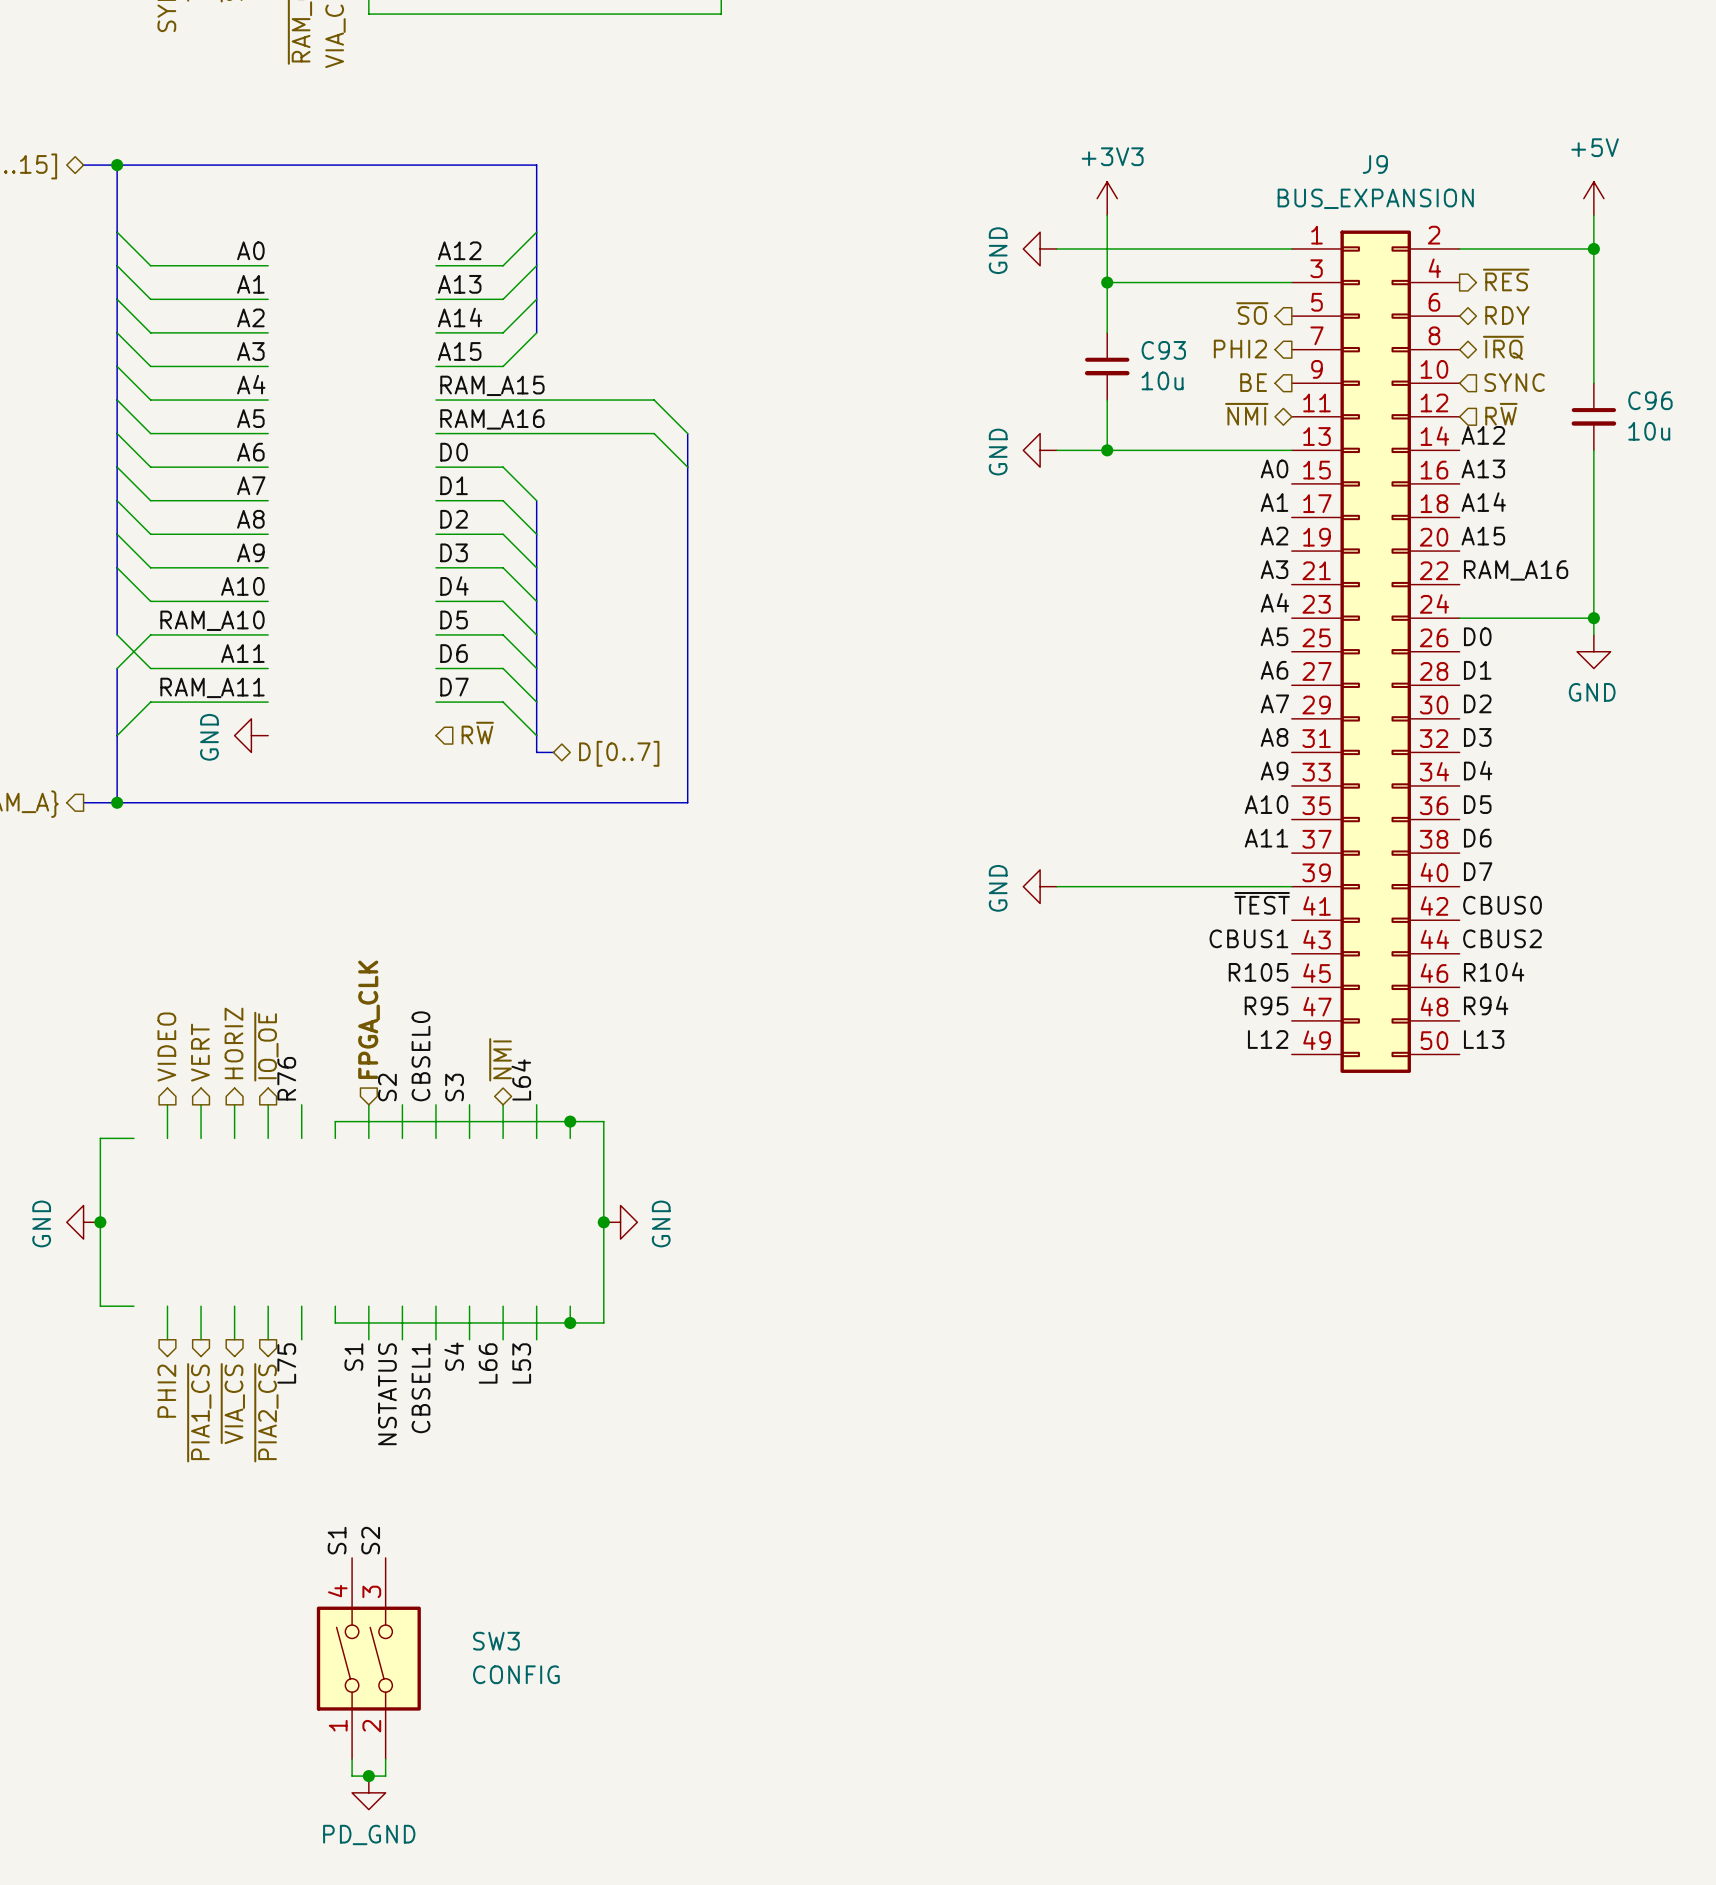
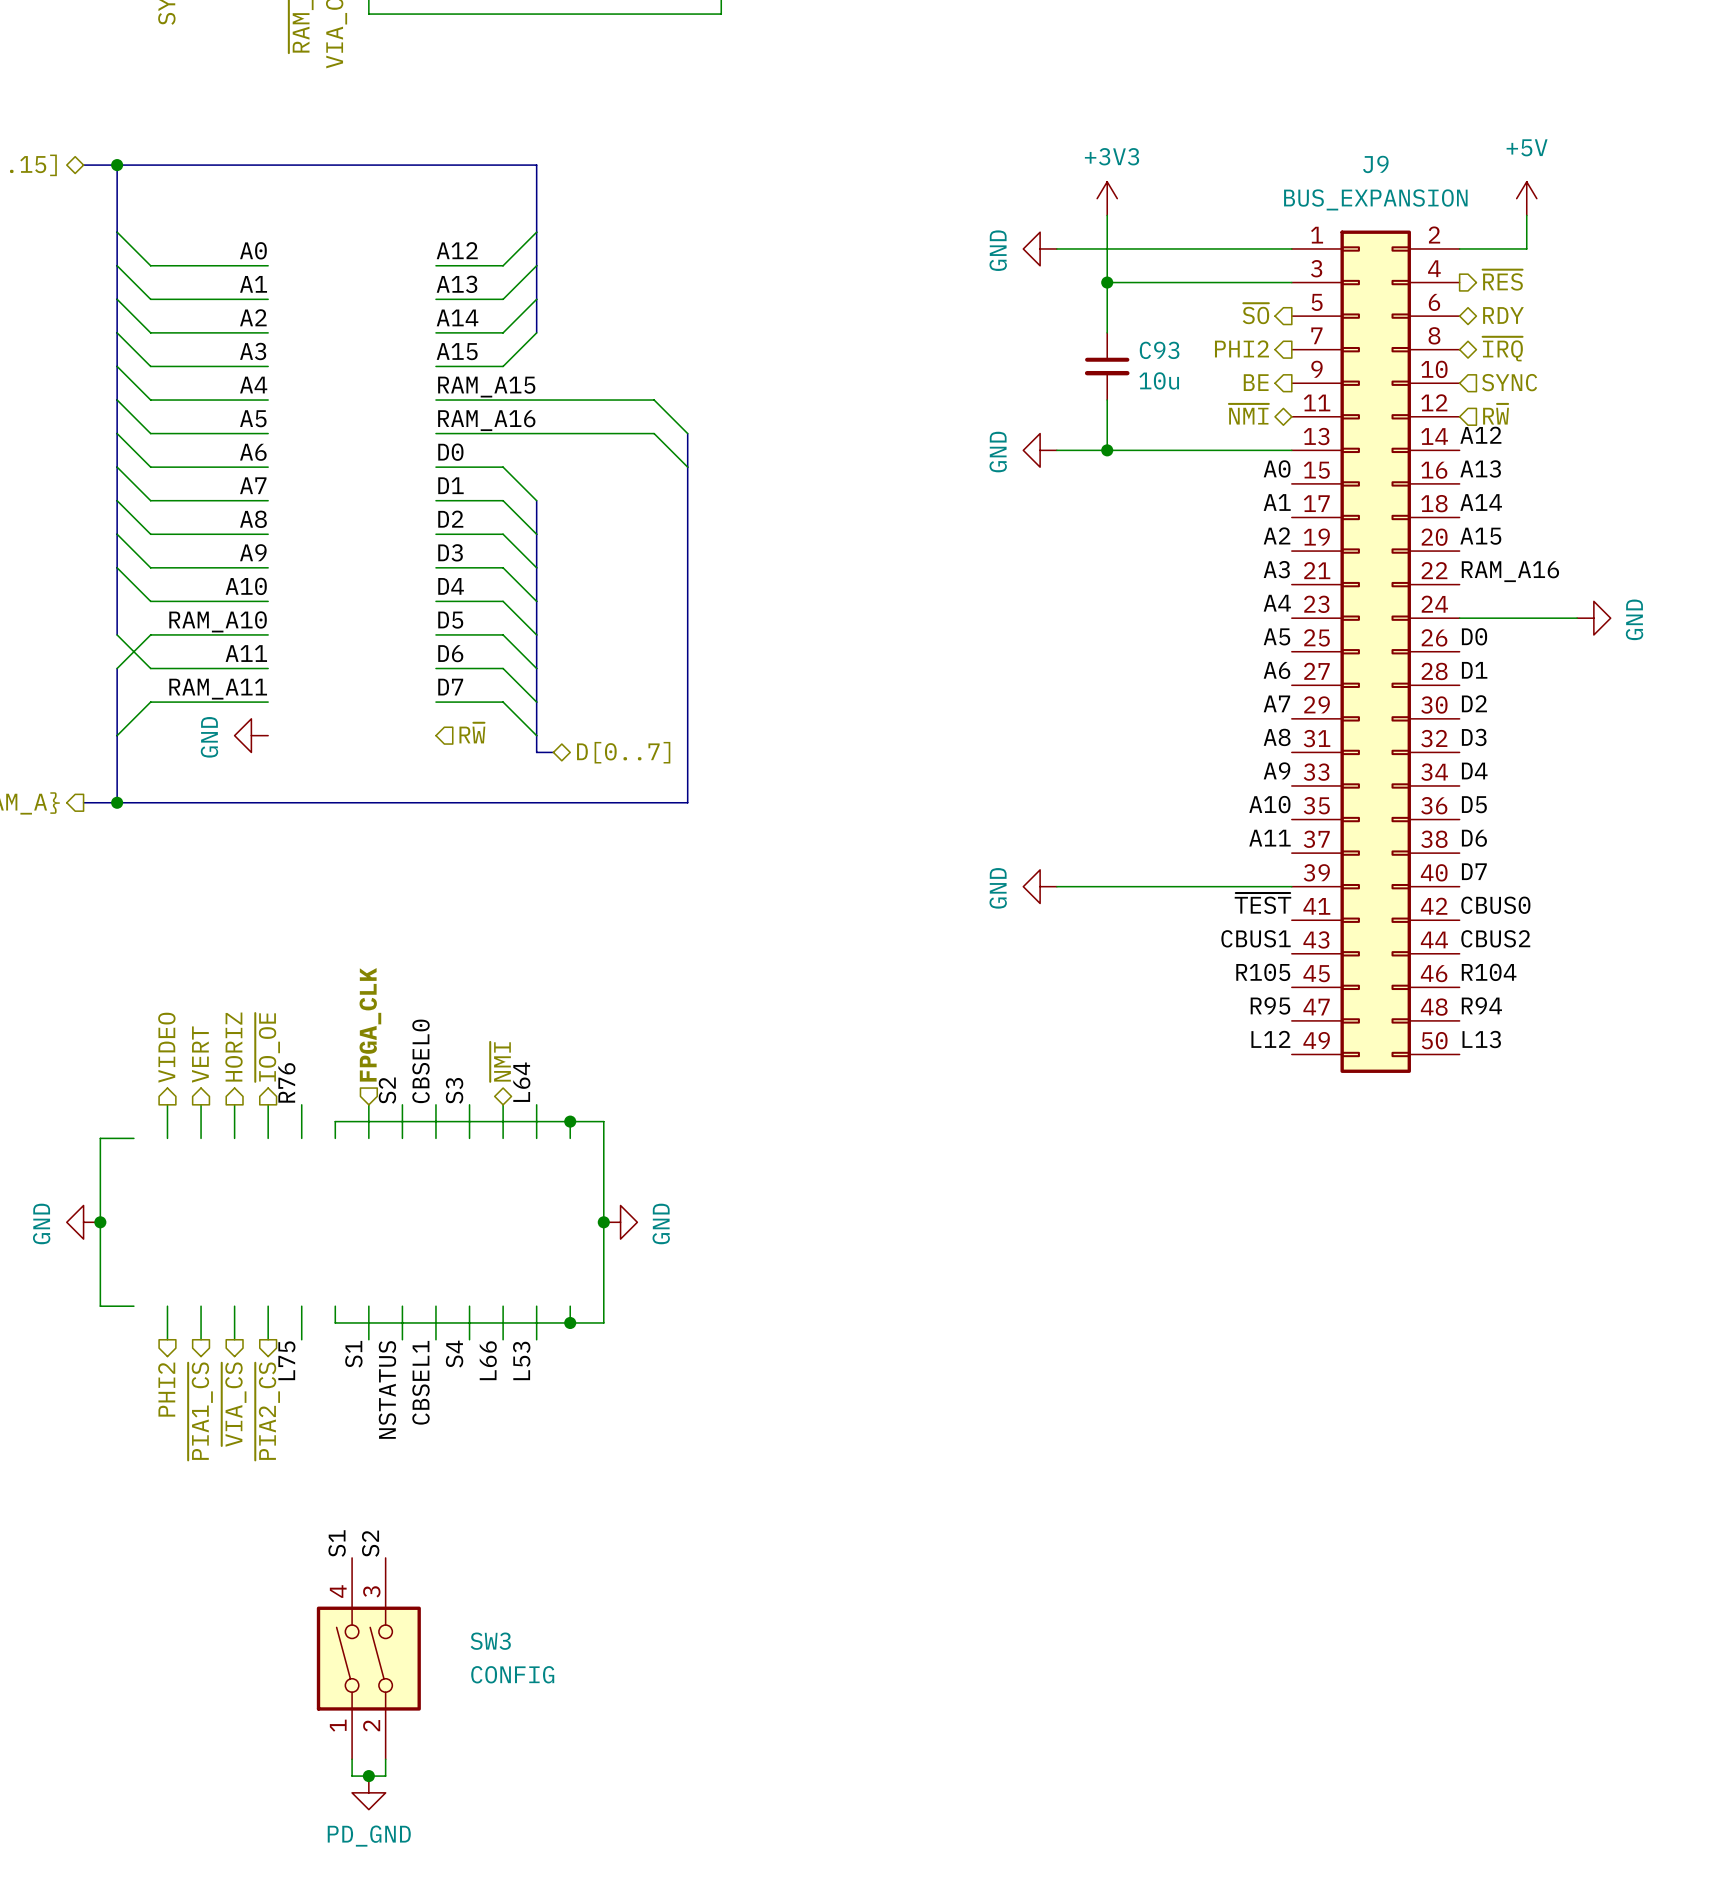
power symbol position: +5V (1593, 198) -> +5V (1526, 198)
wire: (1593, 215) (1593, 383) -> none
wire: (1526, 248) (1593, 248) -> (1526, 248) (1526, 215)
junction: (1593, 248) -> none
C96: 10u (1593, 416) -> none
wire: (1593, 450) (1593, 634) -> none
junction: (1593, 618) -> none
power symbol rotation: 0° (1593, 651) -> 90° counterclockwise (1593, 618)
power symbol position: GND (1593, 651) -> GND (1593, 618)

